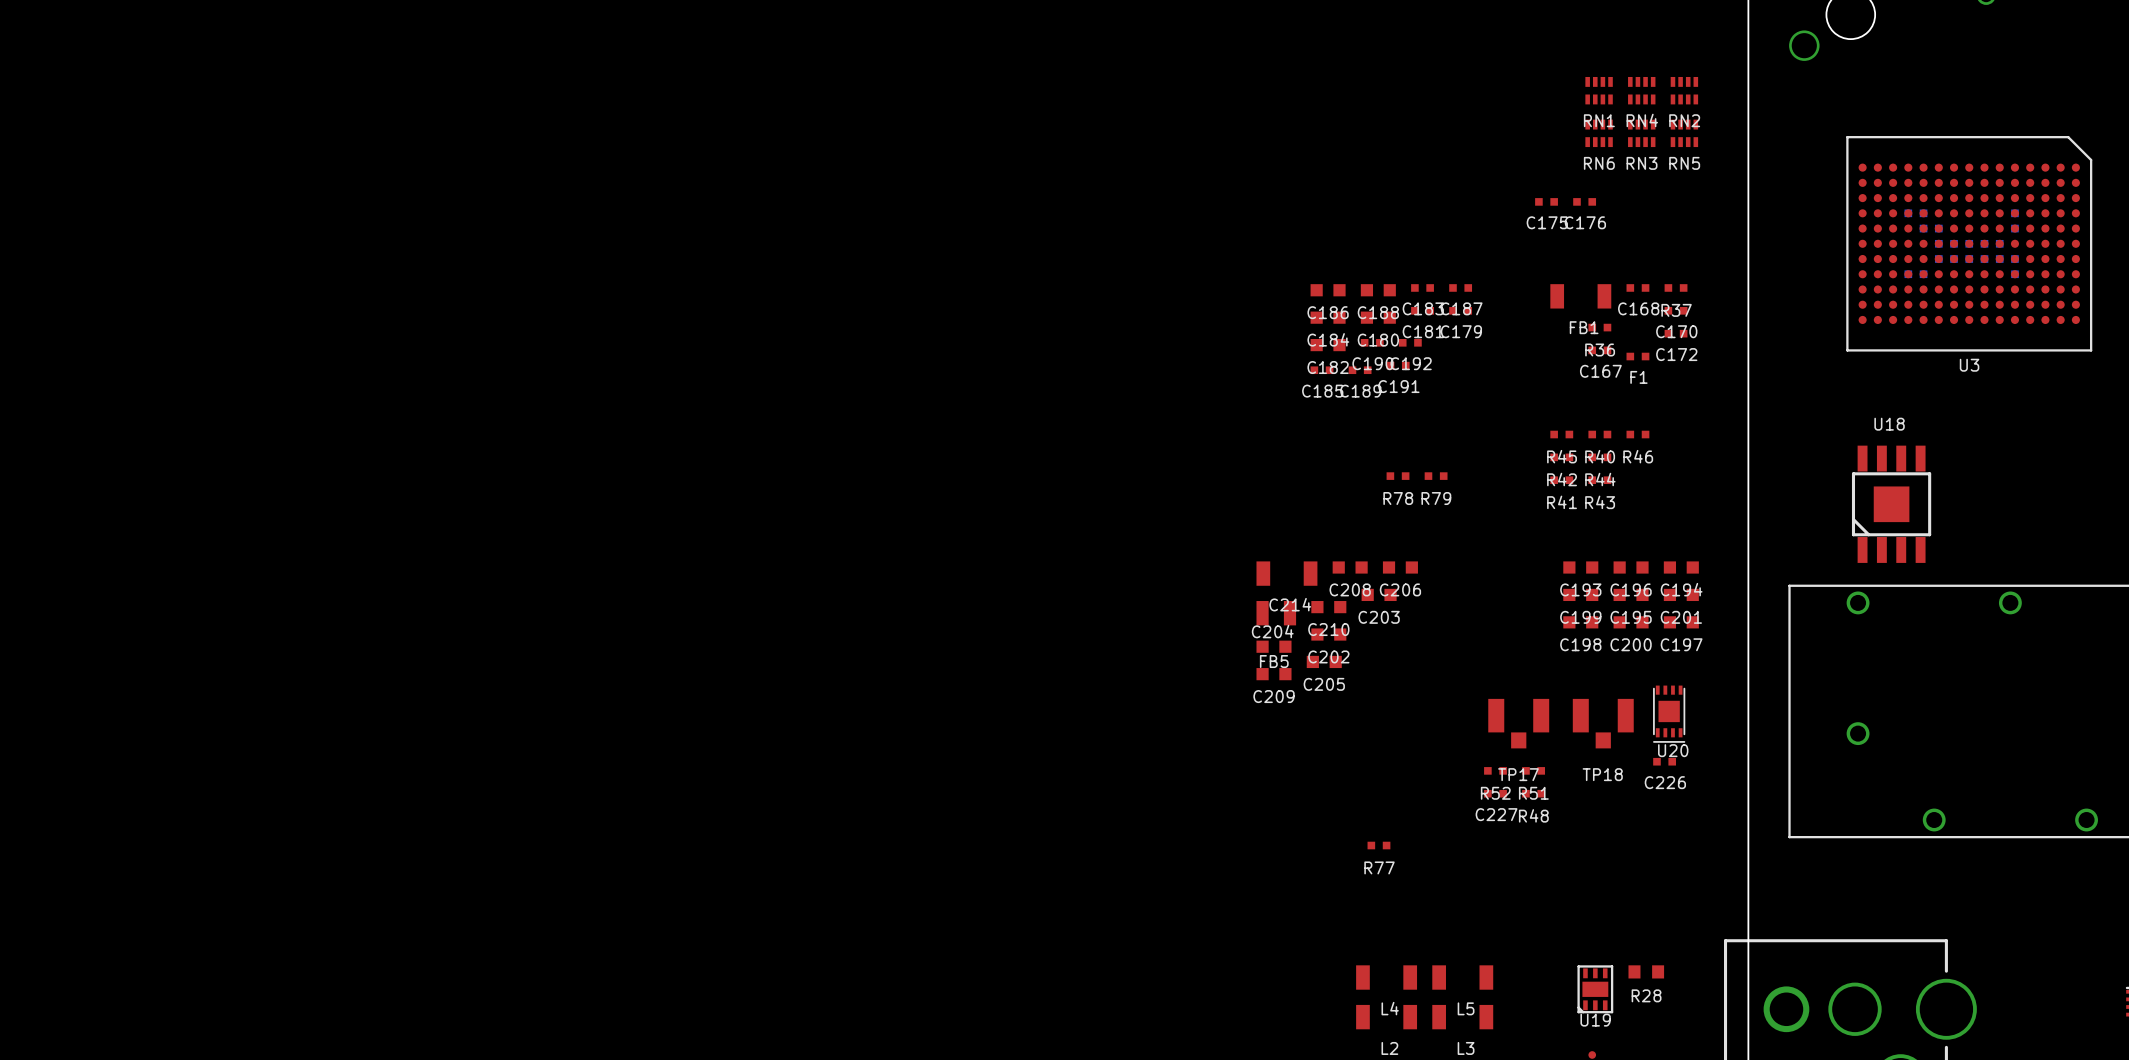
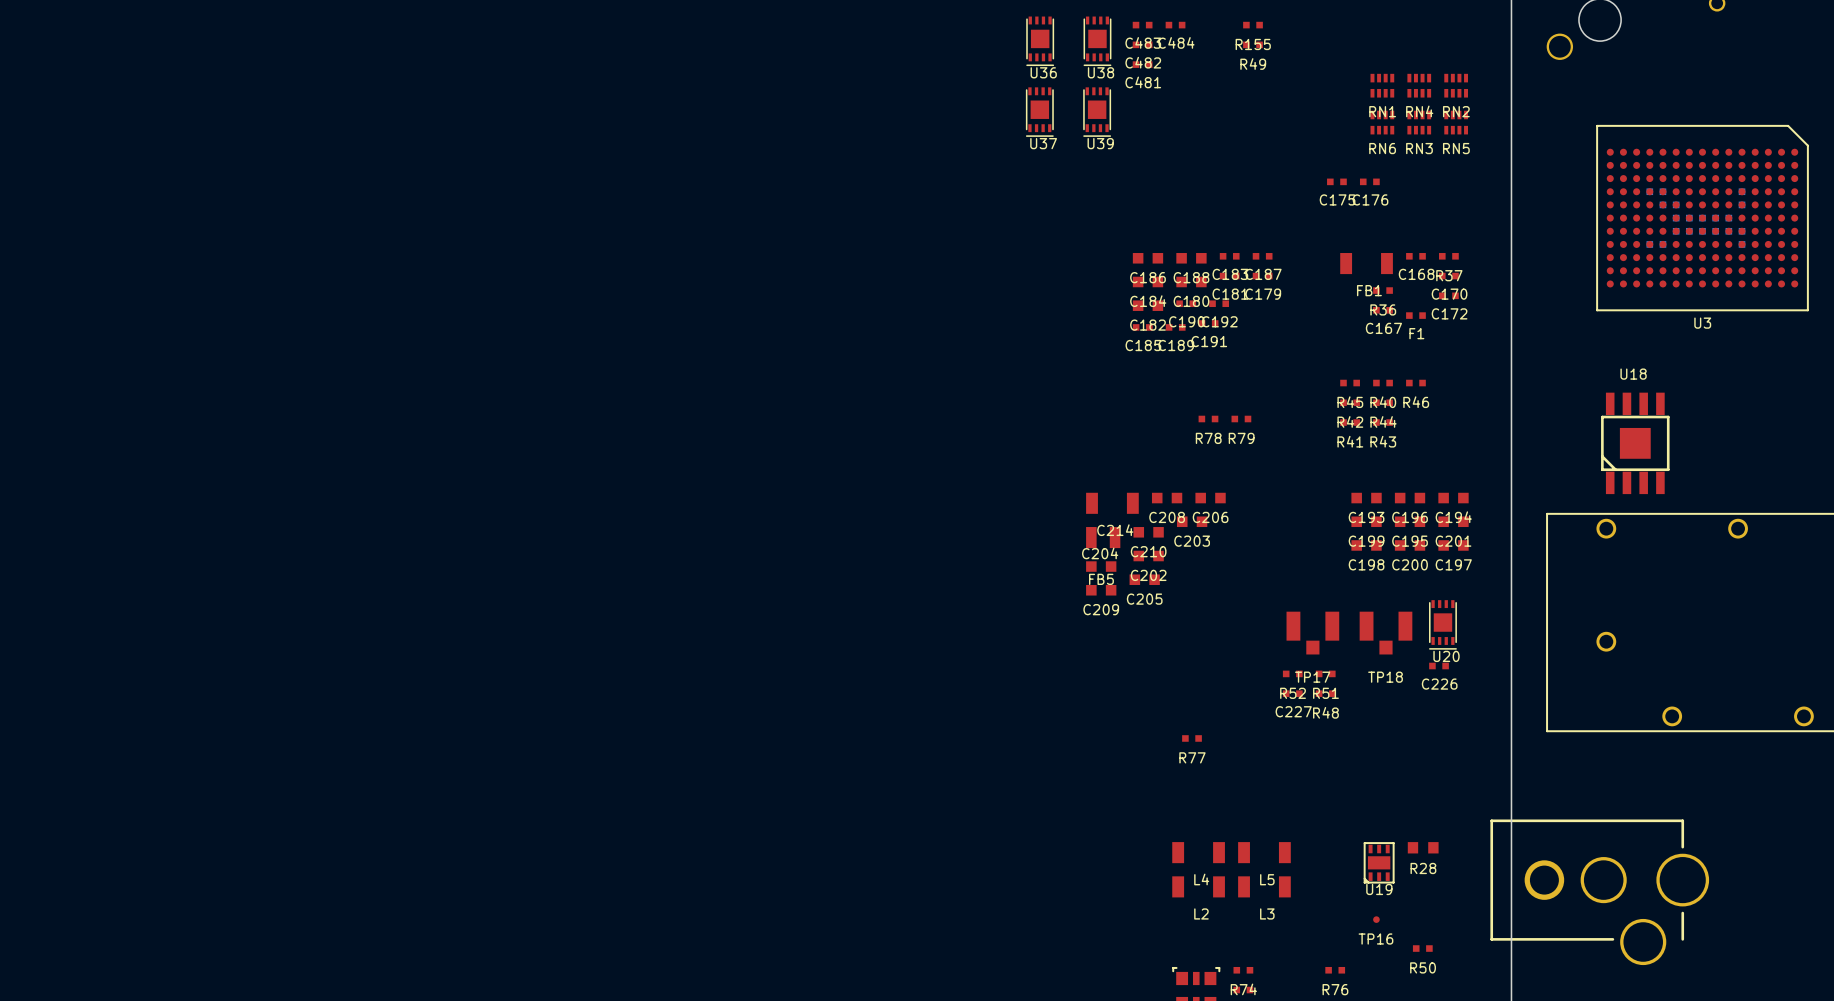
C483: none -> (1142, 25)
C484: none -> (1175, 25)
R155: none -> (1253, 25)
U36: none -> (1040, 41)
U38: none -> (1097, 41)
C482: none -> (1142, 44)
R49: none -> (1253, 44)
C481: none -> (1142, 64)
U37: none -> (1039, 112)
U39: none -> (1097, 112)

